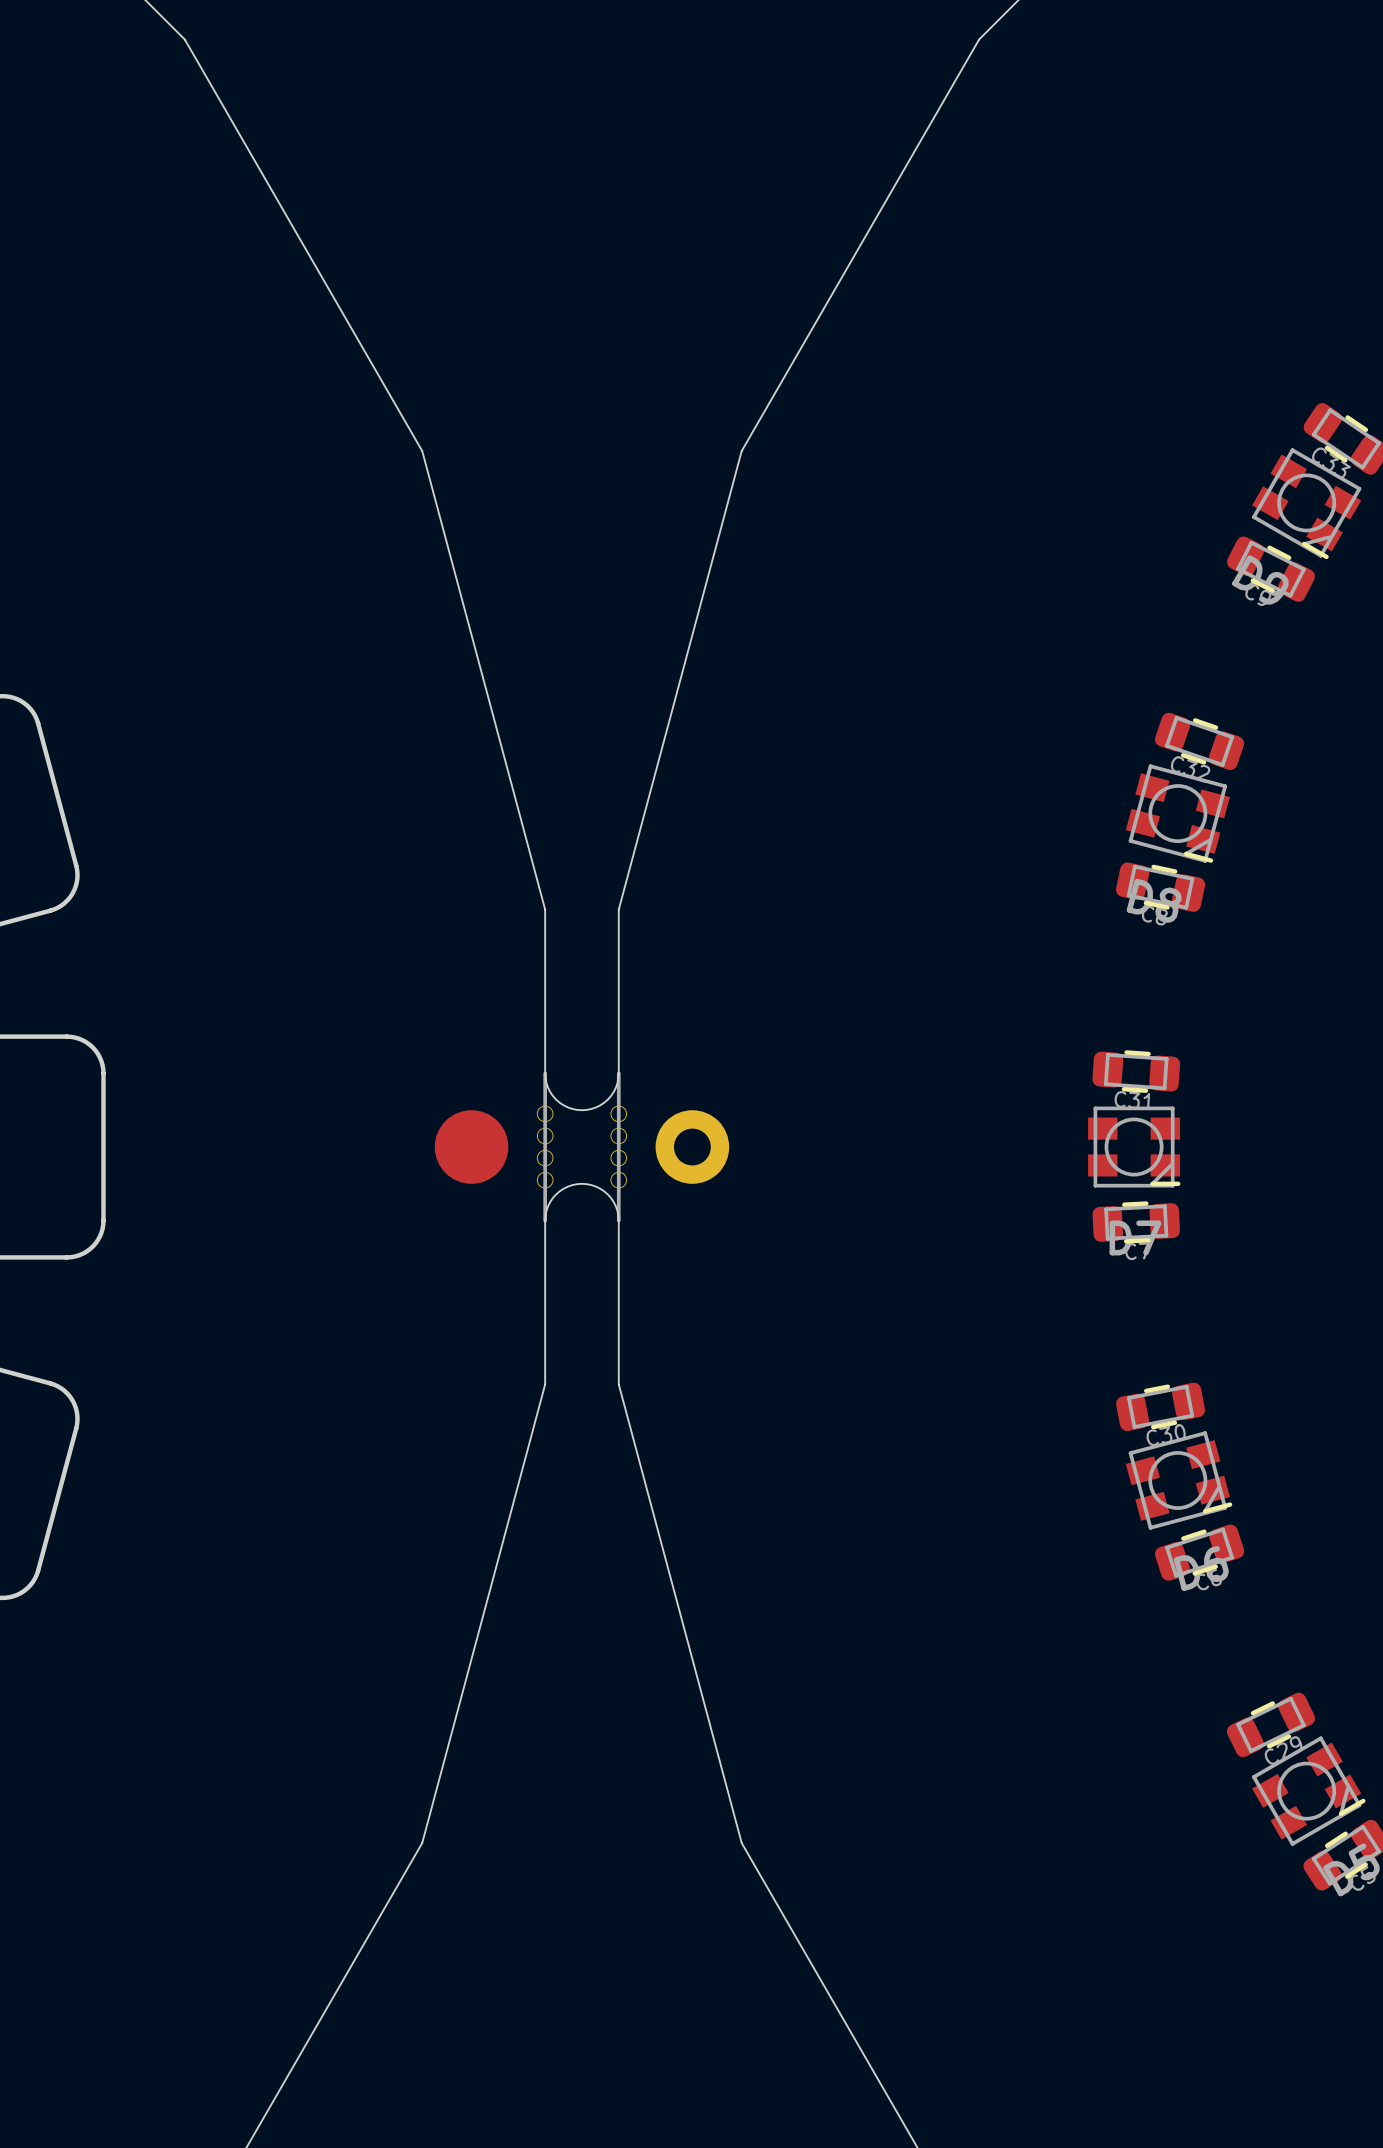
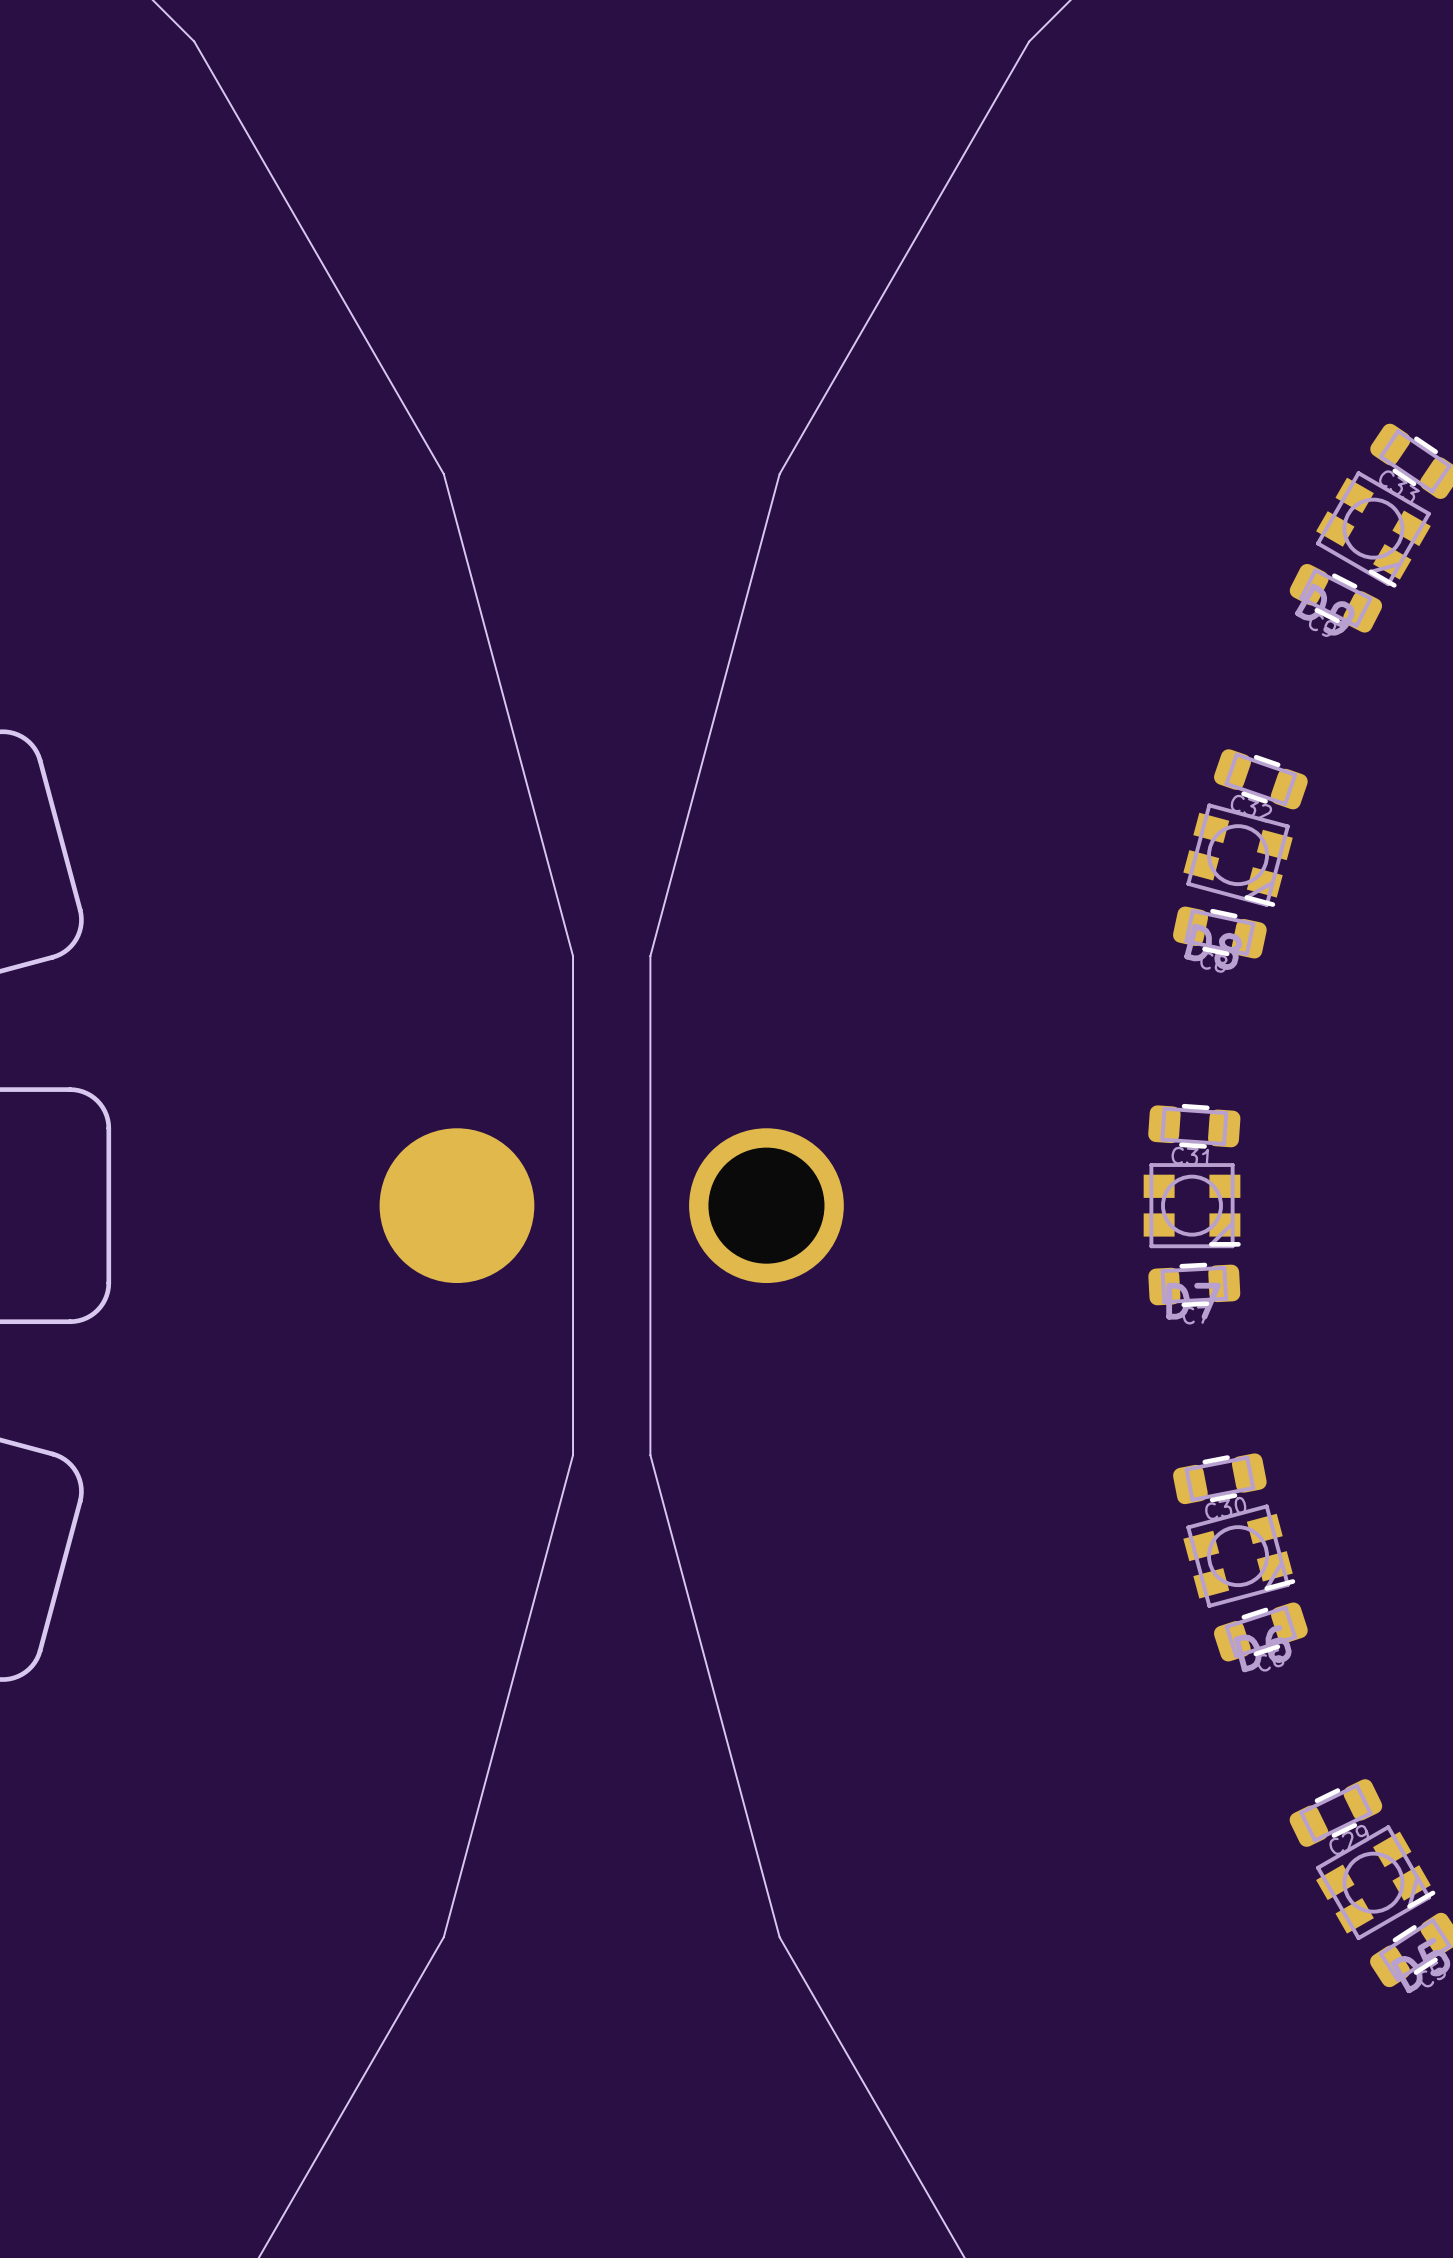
board edge: none -> (573, 1128) (573, 1283)
board edge: none -> (650, 1128) (650, 1283)
part footprint: [434, 1110, 509, 1184] -> [379, 1128, 535, 1284]
part footprint: [655, 1110, 730, 1184] -> [689, 1128, 844, 1284]
part: (581, 1147) -> none

